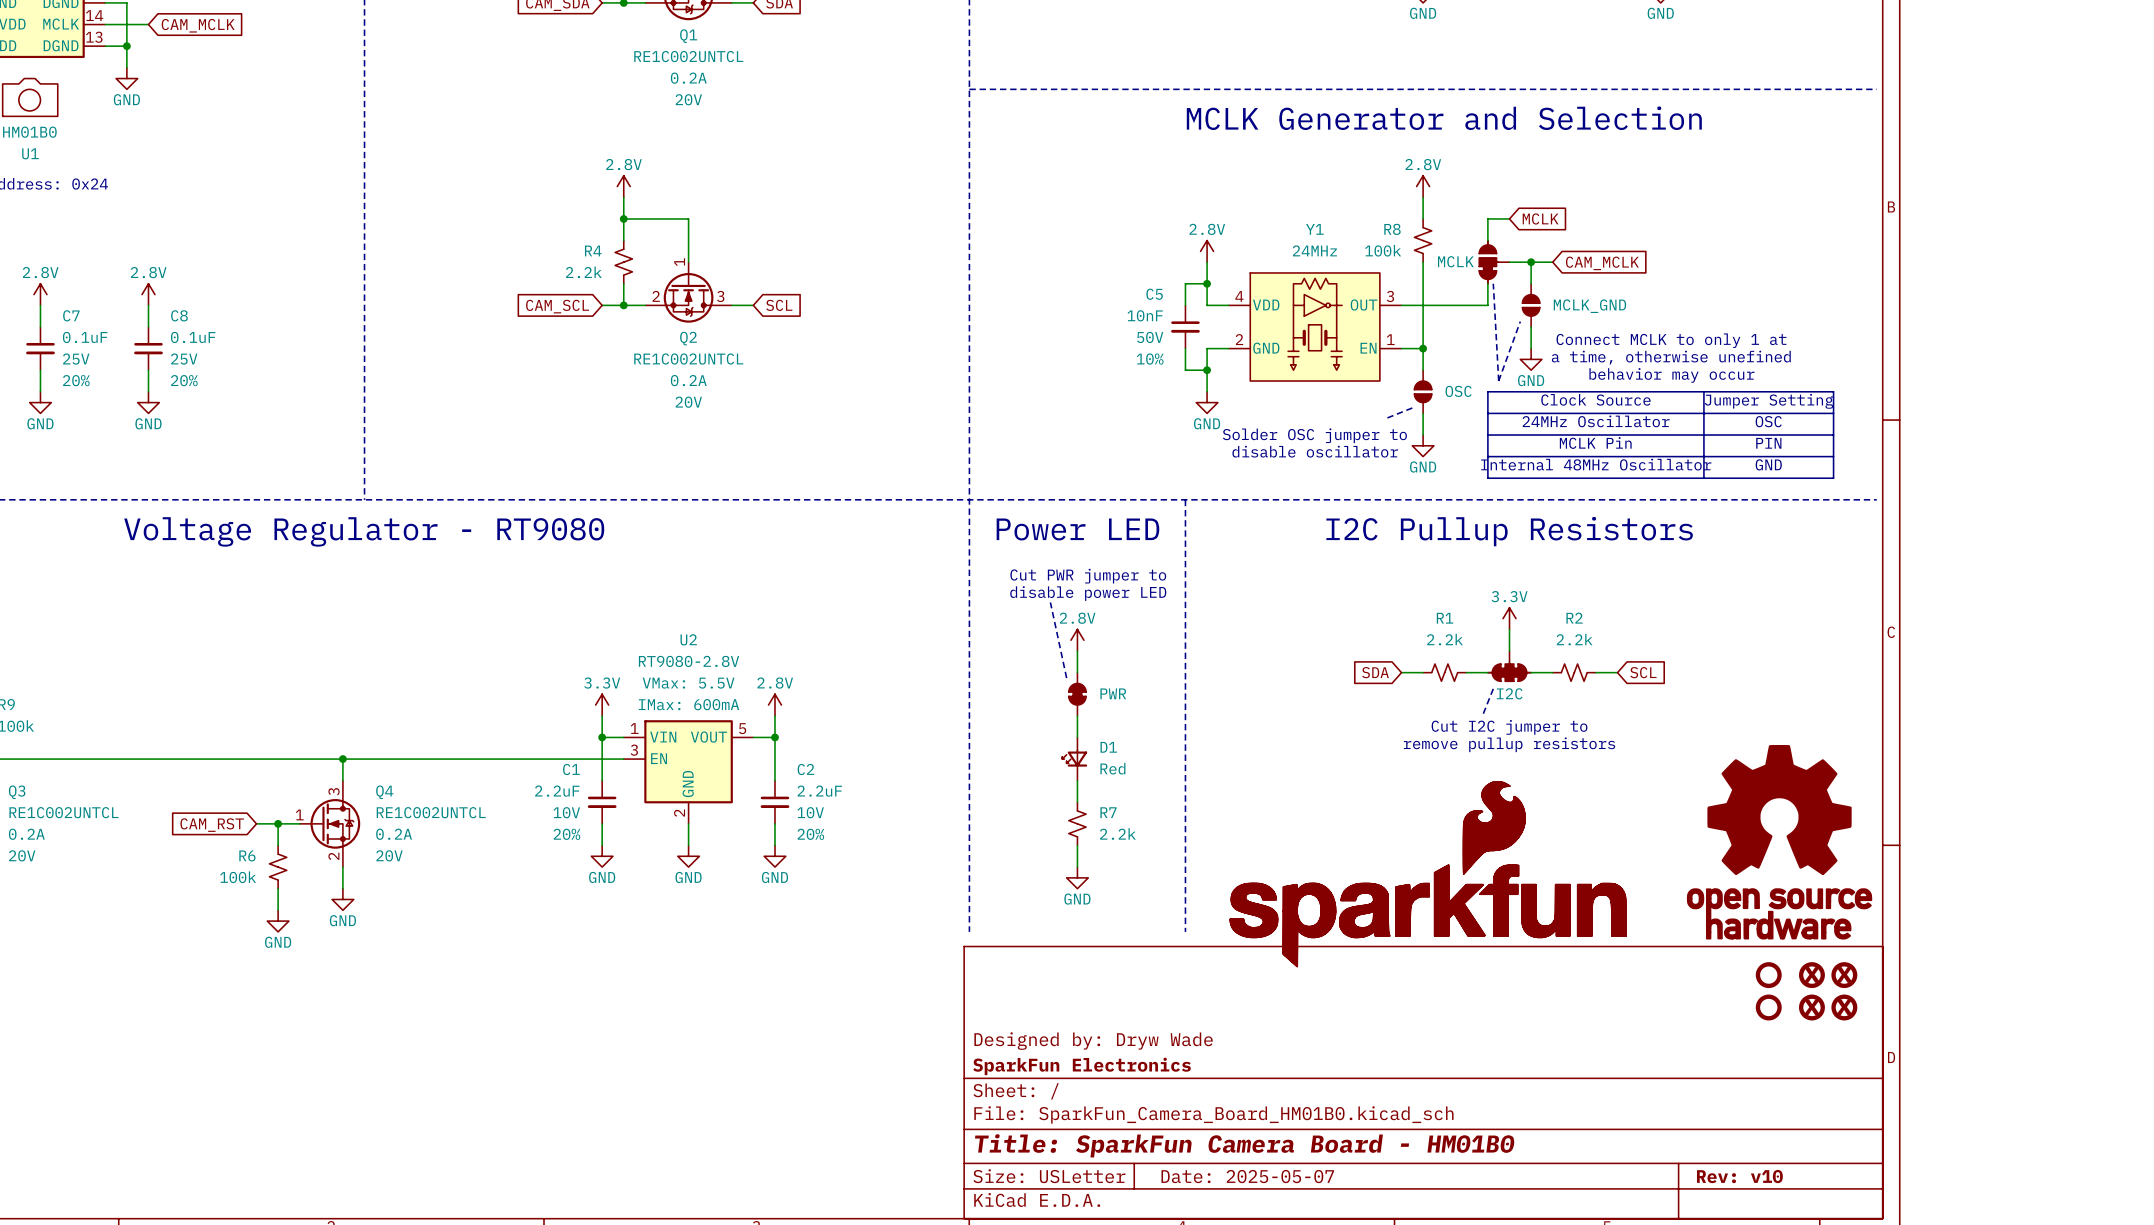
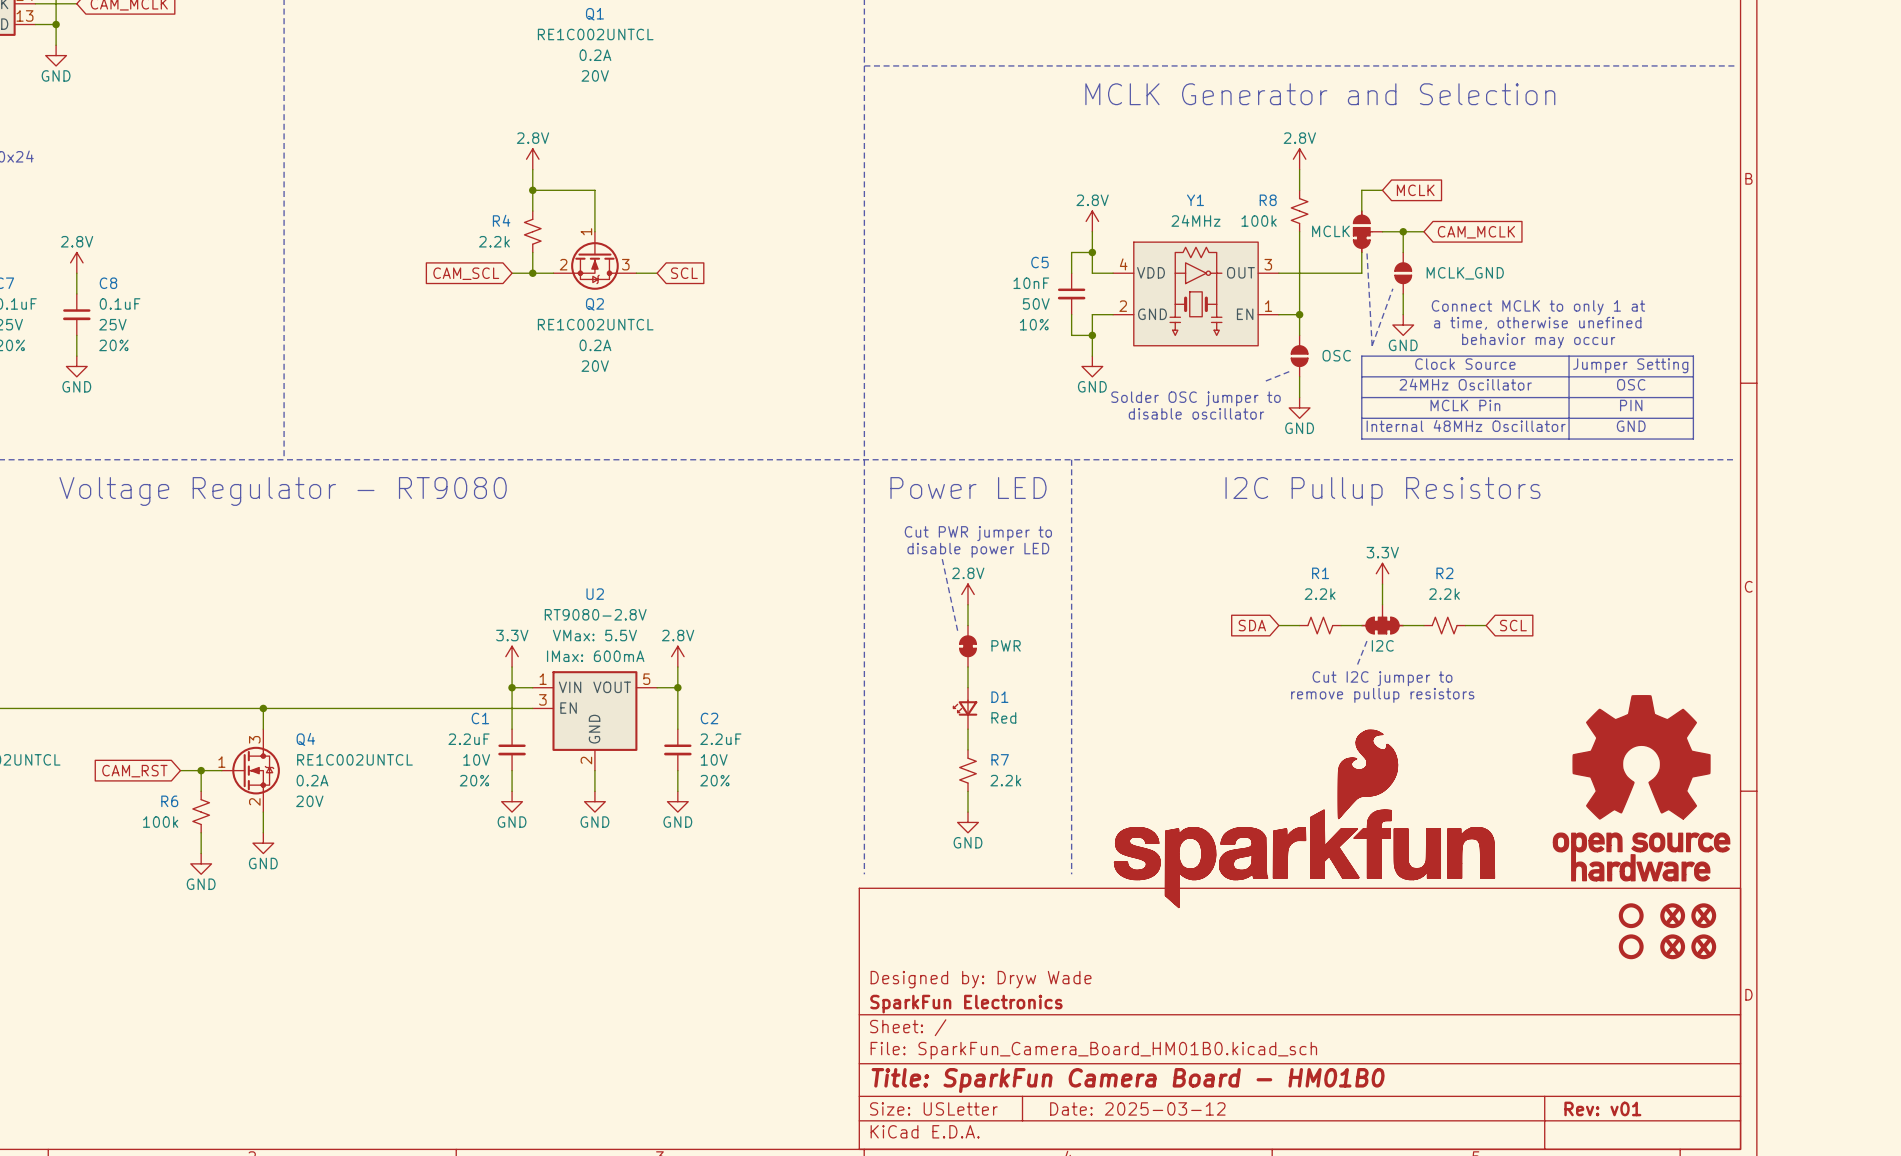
title block: Date: 2025-05-07 (1247, 1176) -> Date: 2025-03-12 (1137, 1108)
title block: Rev: v10 (1739, 1176) -> Rev: v01 (1602, 1108)

